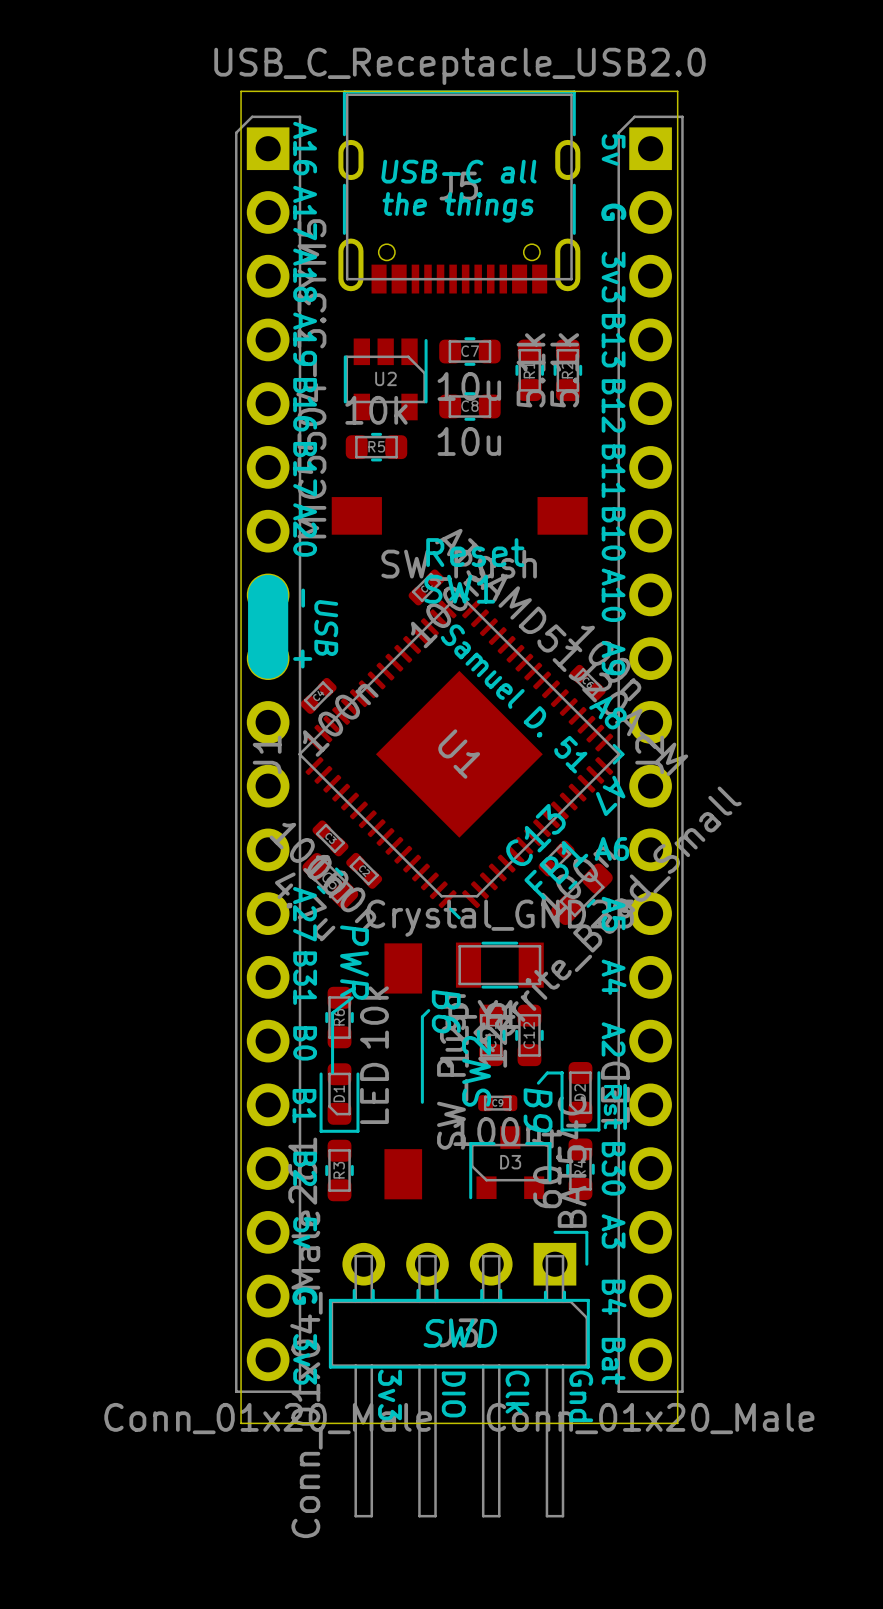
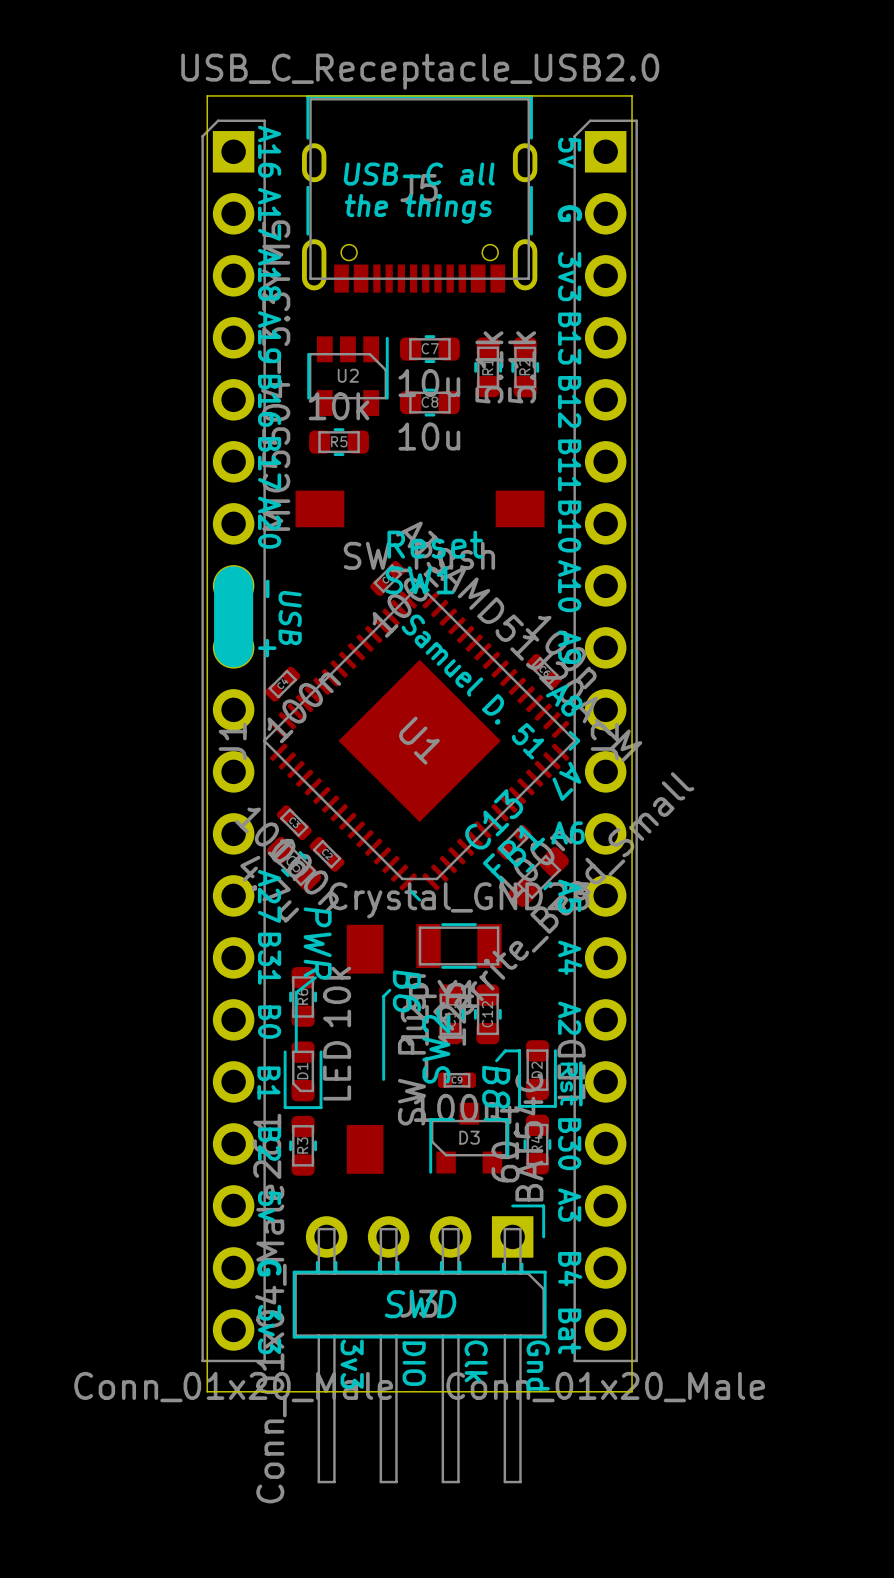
text: B9 (538, 1110) -> B8 (496, 1087)

